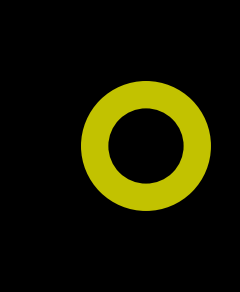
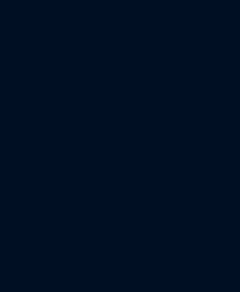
part: (145, 145) -> none

